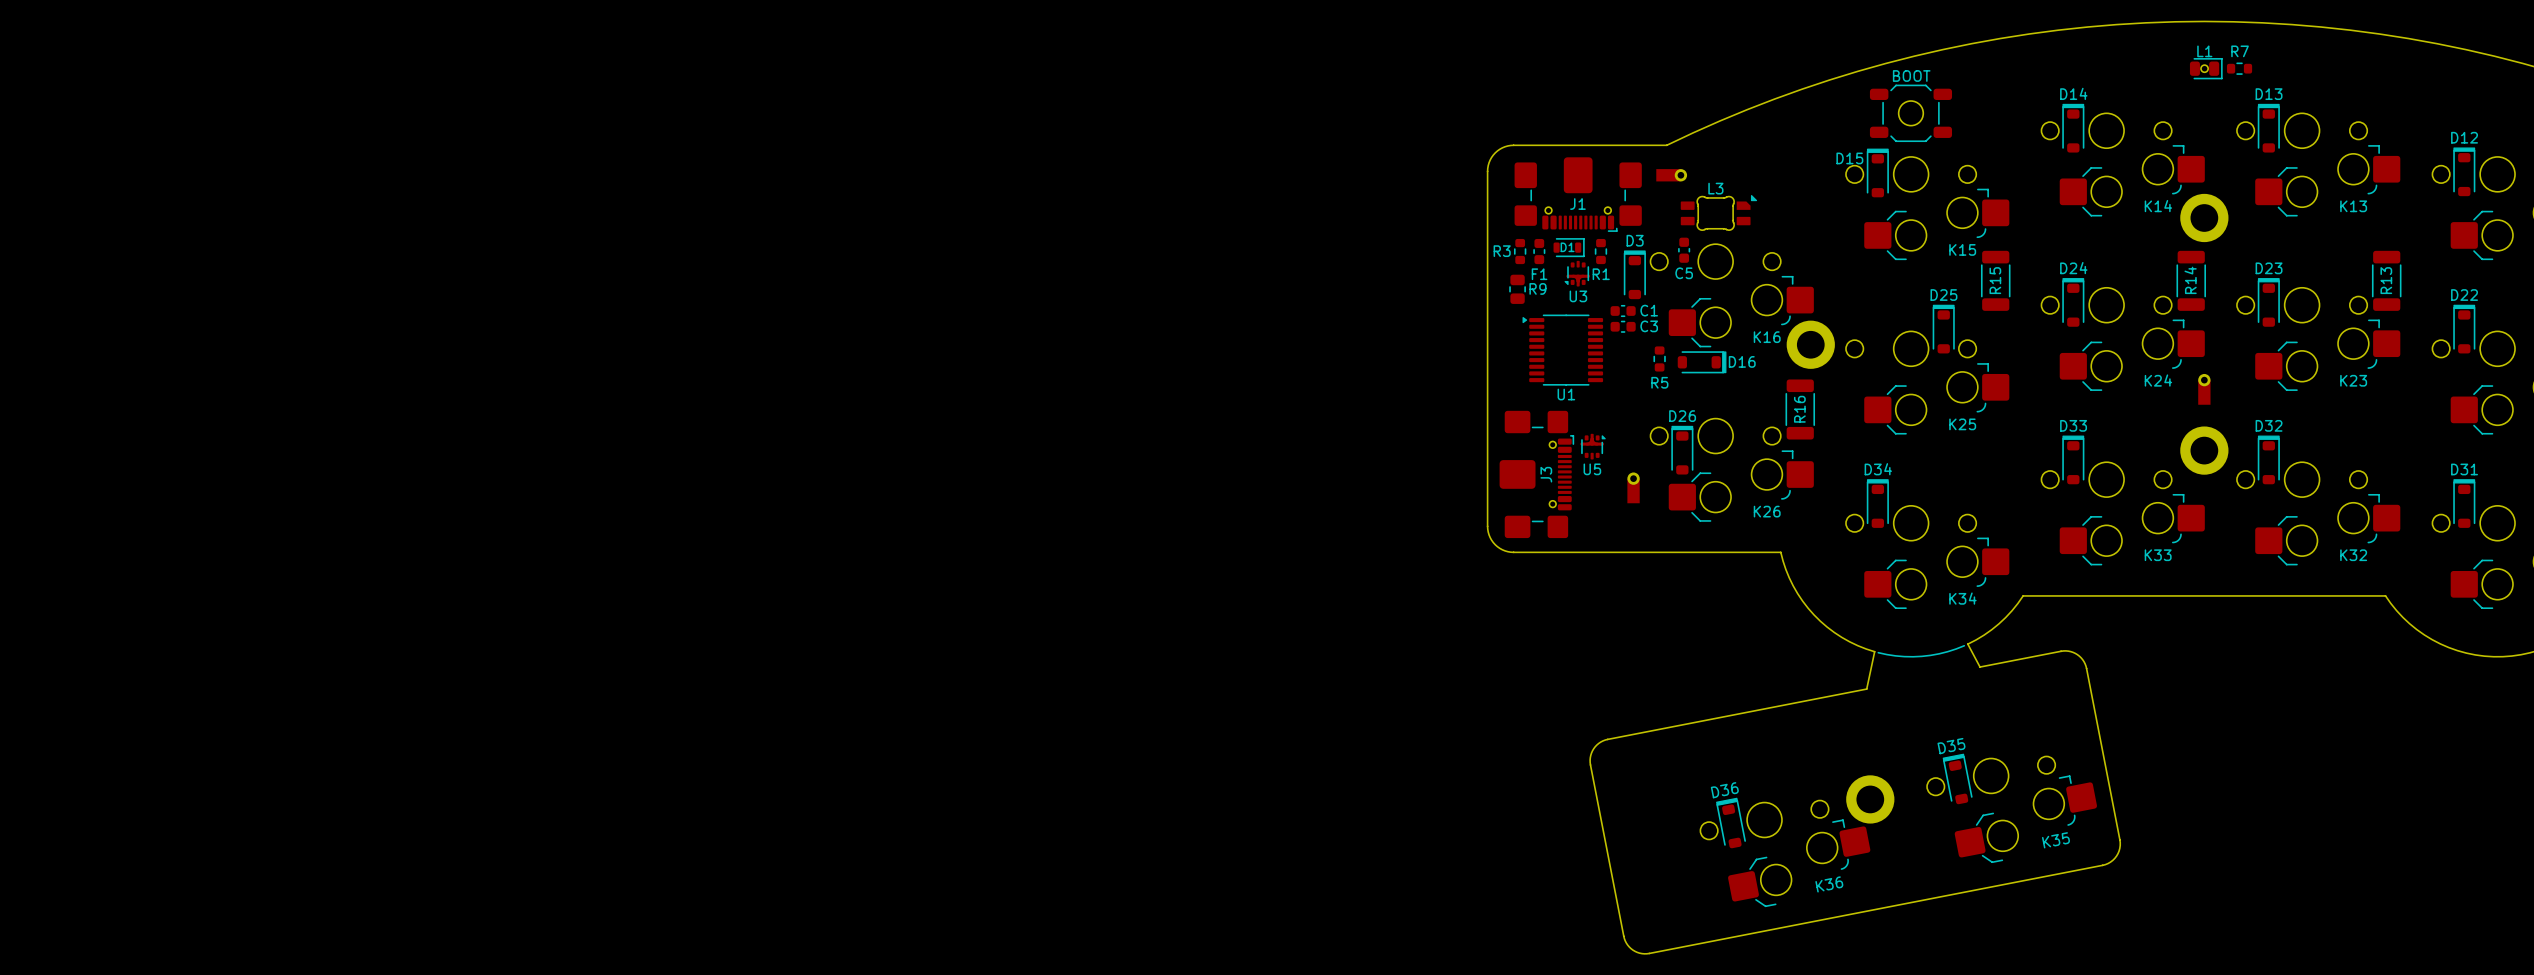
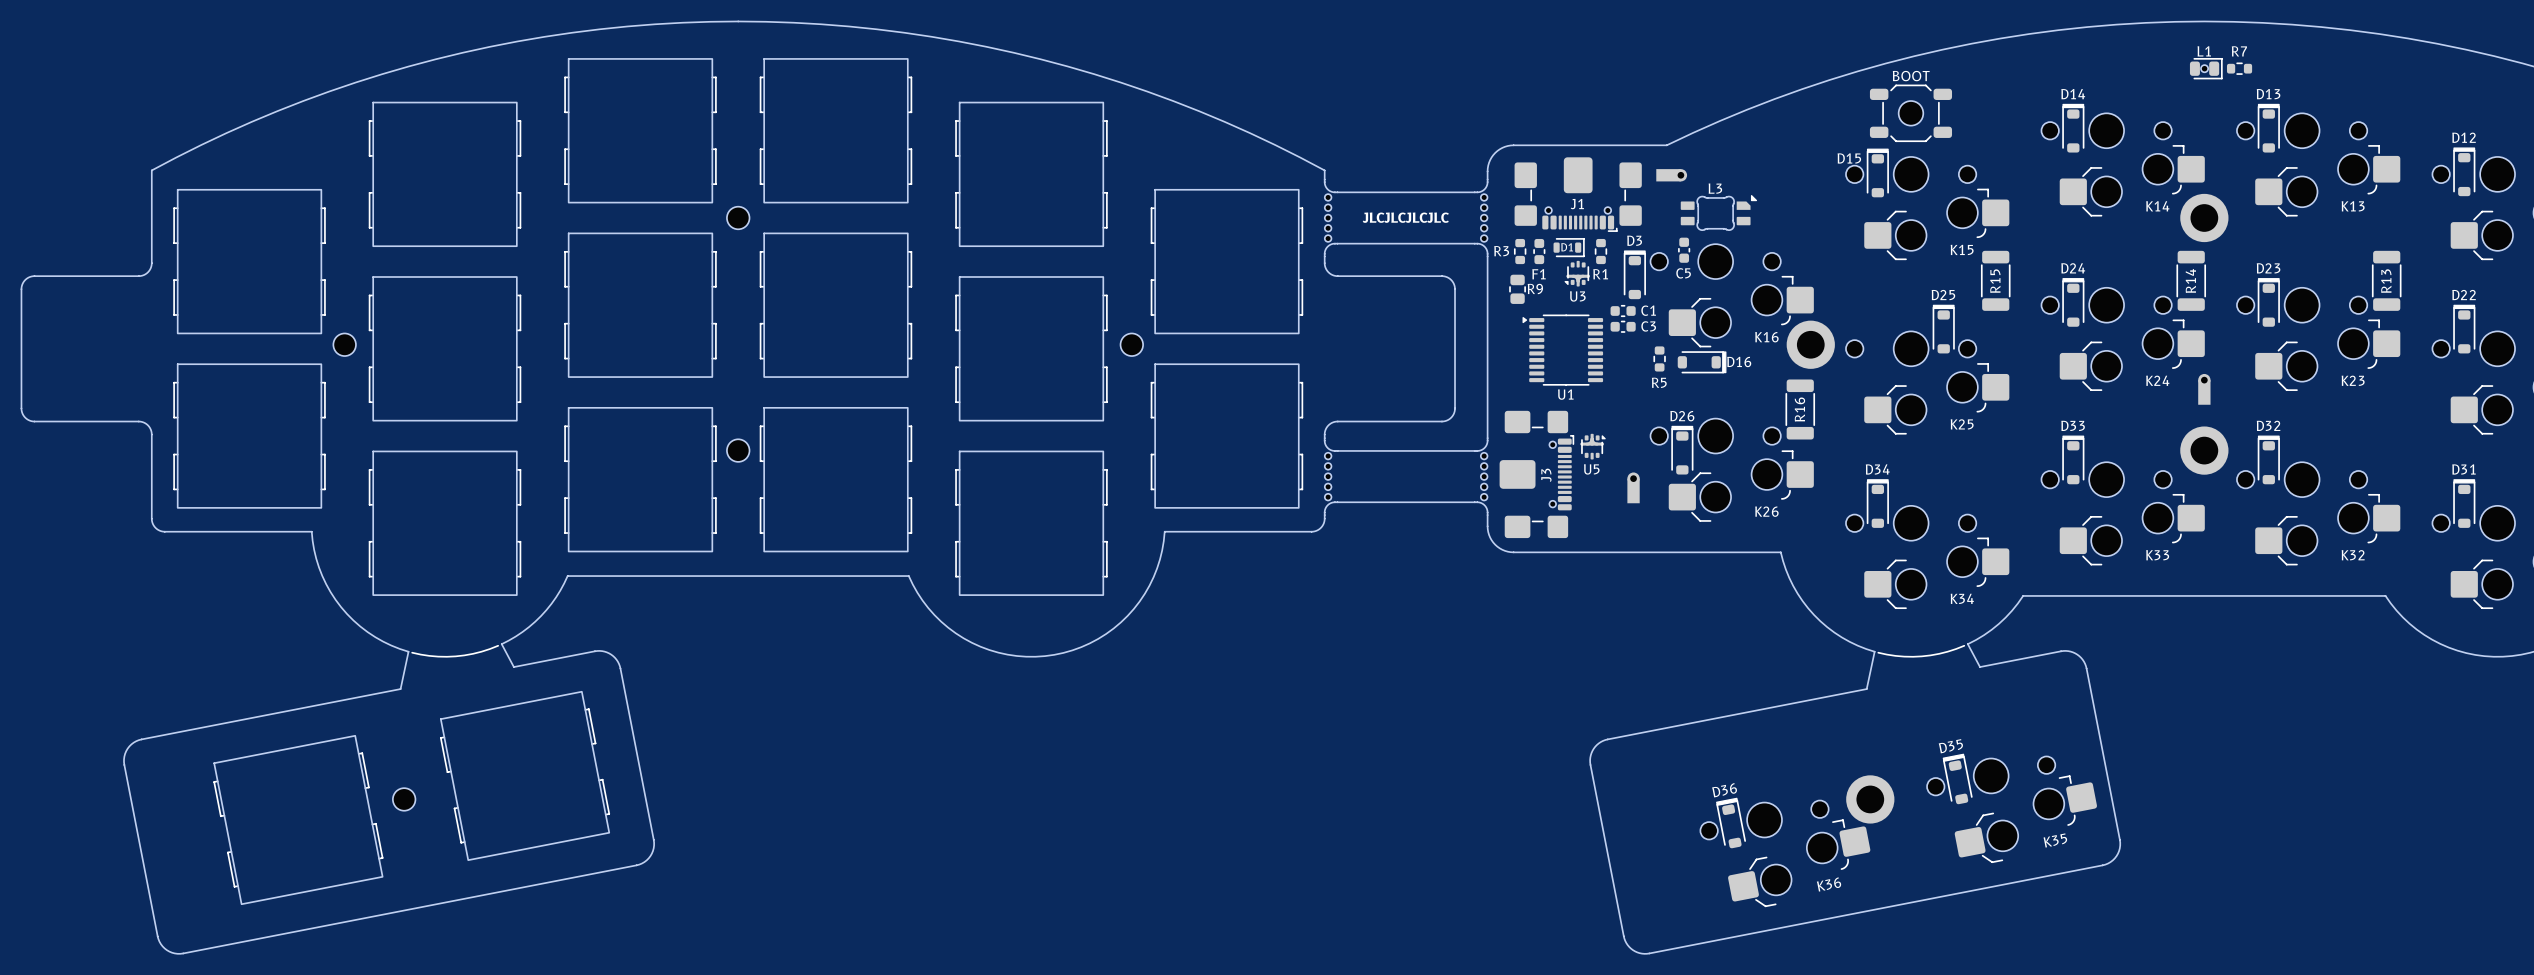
drawing: none -> [564, 58, 717, 203]
drawing: none -> [760, 58, 912, 203]
drawing: none -> [369, 102, 521, 247]
drawing: none -> [955, 102, 1108, 247]
board edge: none -> (1324, 179) (1324, 170) (1250, 133) (1199, 111) (1094, 74) (1013, 52) (904, 32) (821, 24) (710, 21) (627, 26) (517, 41) (435, 59) (355, 82) (251, 121) (151, 170) (151, 263) (146, 273) (138, 276) (33, 276) (25, 279) (21, 289) (21, 408) (25, 417) (34, 421) (138, 421) (145, 423) (151, 432) (151, 518) (156, 528) (164, 531) (311, 531) (316, 558) (322, 575) (341, 607) (353, 620) (375, 637) (408, 651) (400, 689) (141, 739) (129, 746) (125, 753) (124, 764) (157, 936) (164, 948) (174, 953) (183, 953) (636, 865) (646, 860) (652, 851) (653, 839) (620, 668) (616, 659) (609, 653) (597, 650) (513, 667) (501, 644) (522, 631) (540, 616) (556, 597) (567, 576) (908, 576) (922, 600) (934, 615) (963, 638) (989, 649) (1007, 654) (1044, 656) (1063, 652) (1089, 643) (1106, 633) (1127, 615) (1139, 601) (1153, 577) (1159, 559) (1164, 531) (1313, 531) (1322, 525) (1324, 515)
board edge: (1487, 179) (1487, 256) -> none
drawing: none -> [173, 189, 326, 334]
drawing: none -> [1151, 189, 1303, 334]
board edge: none -> (1337, 192) (1474, 192)
part: none -> (738, 217)
part: none -> (1331, 217)
text: none -> JLCJLCJLCJLC (1405, 217)
part: none -> (1481, 217)
drawing: none -> [564, 233, 717, 378]
drawing: none -> [760, 233, 912, 378]
board edge: none -> (1337, 243) (1474, 243)
board edge: none -> (1324, 256) (1325, 268) (1334, 275) (1443, 276) (1452, 281) (1455, 289) (1455, 408) (1452, 416) (1441, 421) (1334, 421) (1326, 427) (1324, 438)
drawing: none -> [369, 276, 521, 421]
drawing: none -> [955, 276, 1108, 421]
part: none -> (344, 344)
part: none -> (1131, 344)
drawing: none -> [173, 363, 326, 509]
drawing: none -> [1151, 363, 1303, 509]
drawing: none -> [564, 407, 717, 552]
drawing: none -> [760, 407, 912, 552]
board edge: (1487, 438) (1487, 515) -> none
part: none -> (738, 450)
board edge: none -> (1337, 450) (1474, 450)
drawing: none -> [369, 451, 521, 596]
drawing: none -> [955, 451, 1108, 596]
part: none -> (1331, 476)
part: none -> (1481, 476)
board edge: none -> (1337, 502) (1474, 502)
line: none -> (498, 645) (481, 651) (455, 656) (438, 656) (412, 652)
drawing: none -> [440, 691, 610, 861]
drawing: none -> [213, 735, 384, 905]
part: none -> (404, 799)

